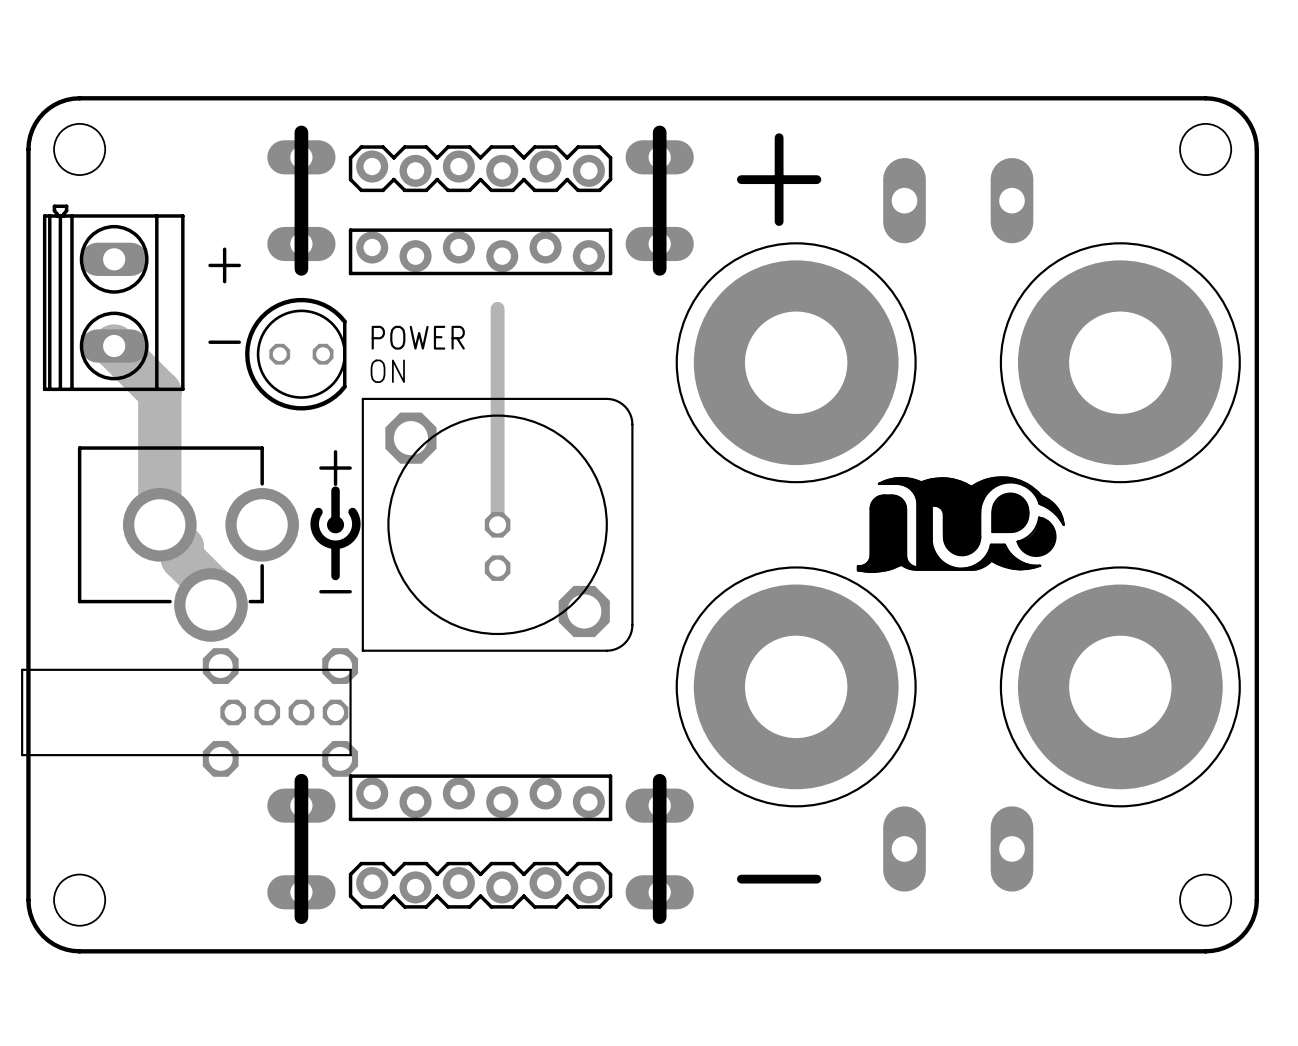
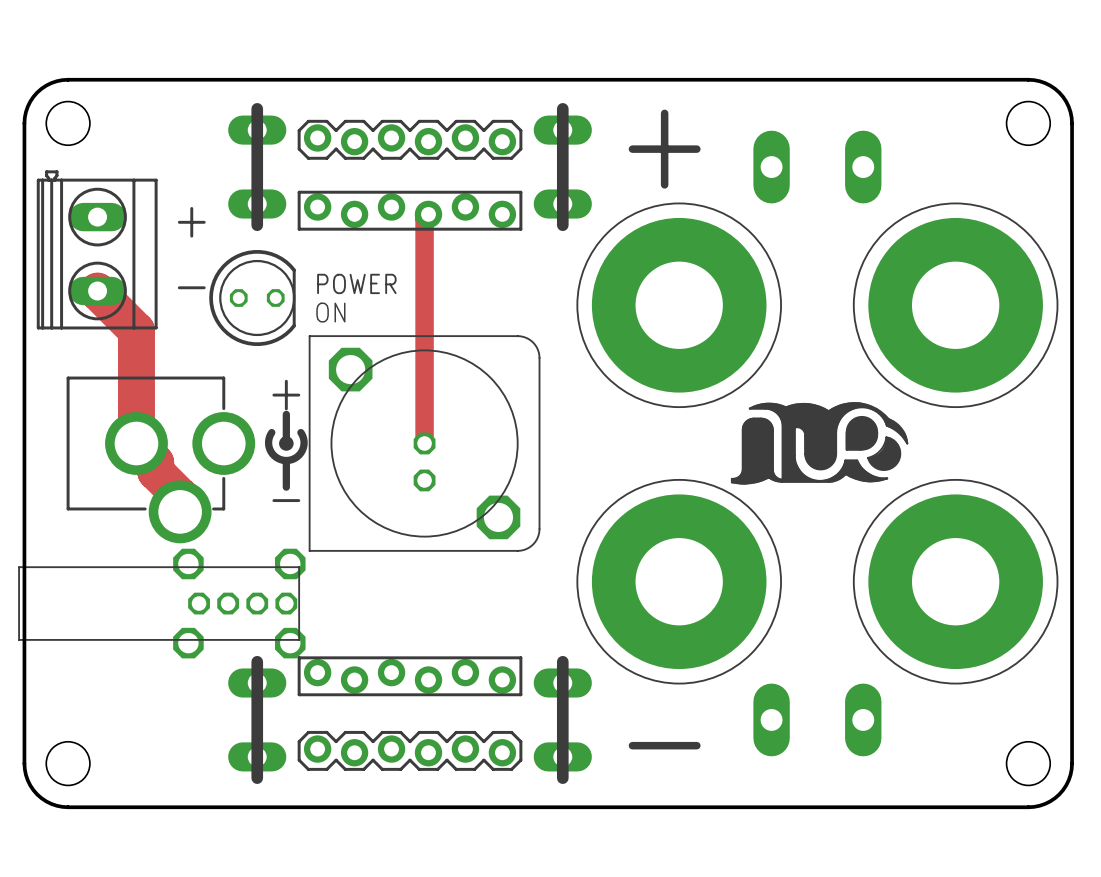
track: none -> (428, 214) (424, 218) (424, 259)
track width: thin (497, 308) (497, 524) -> thick (424, 259) (424, 443)

